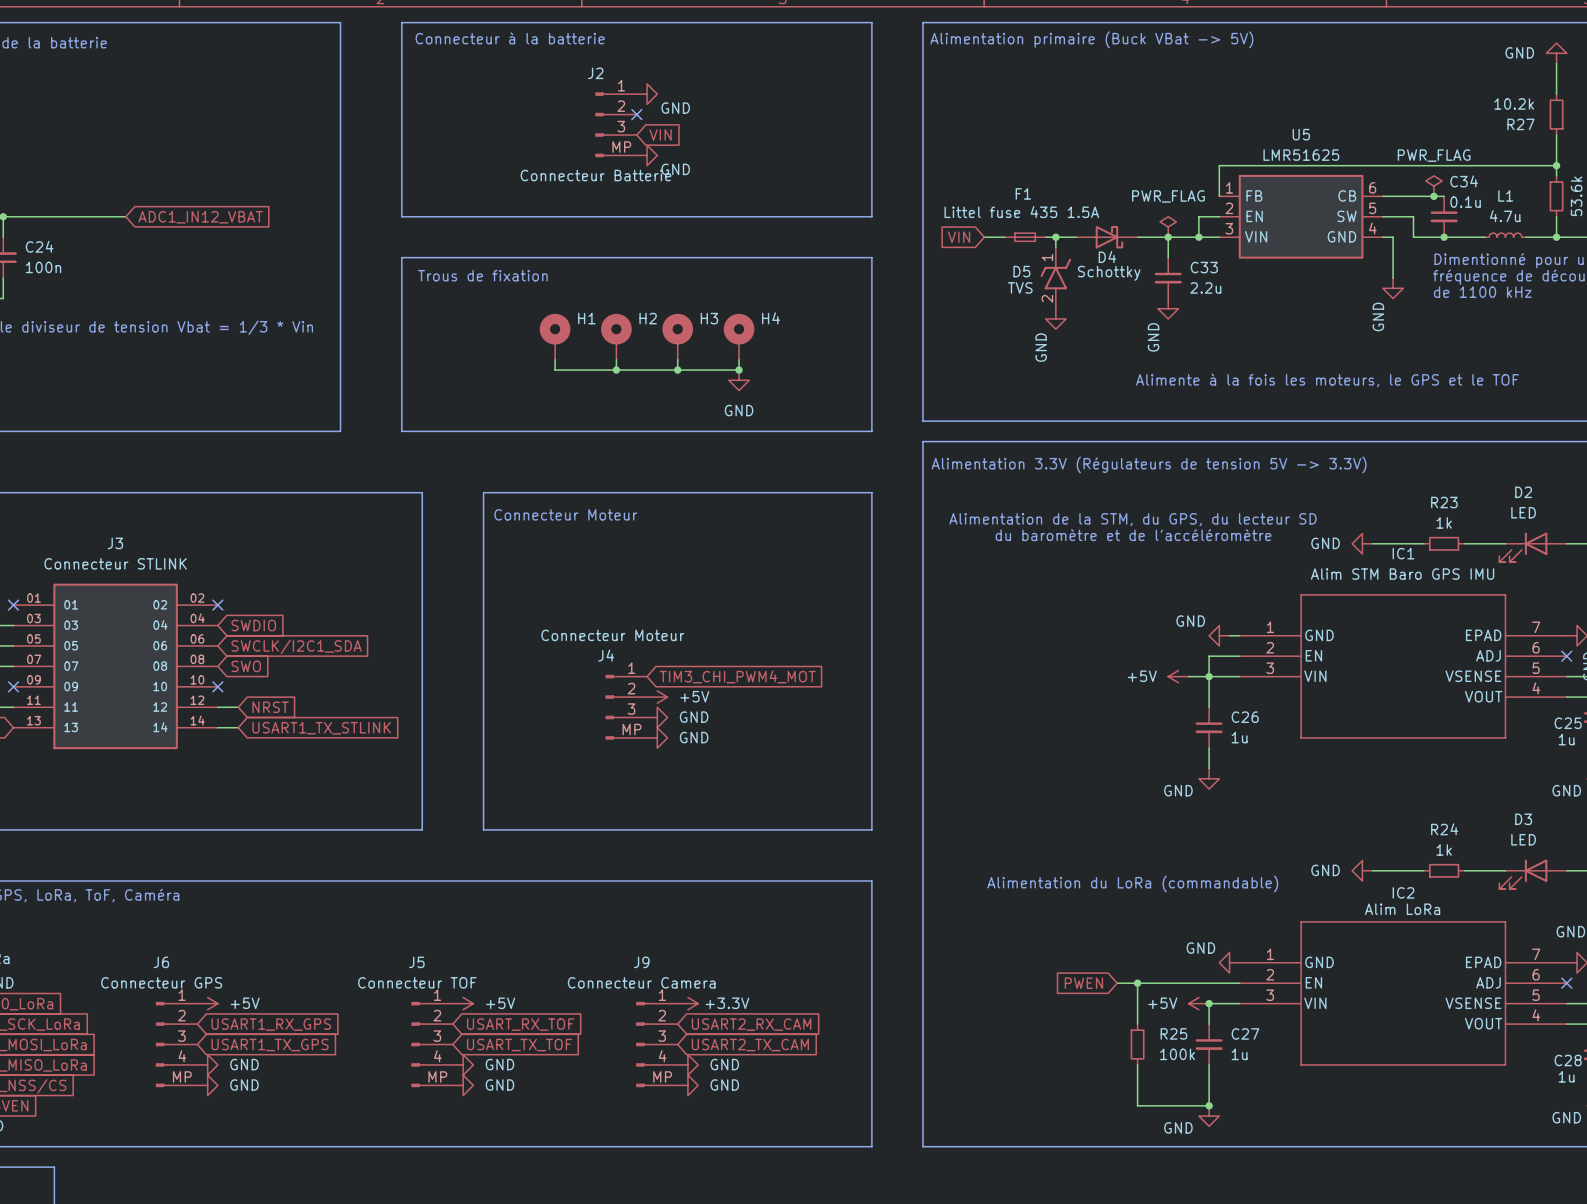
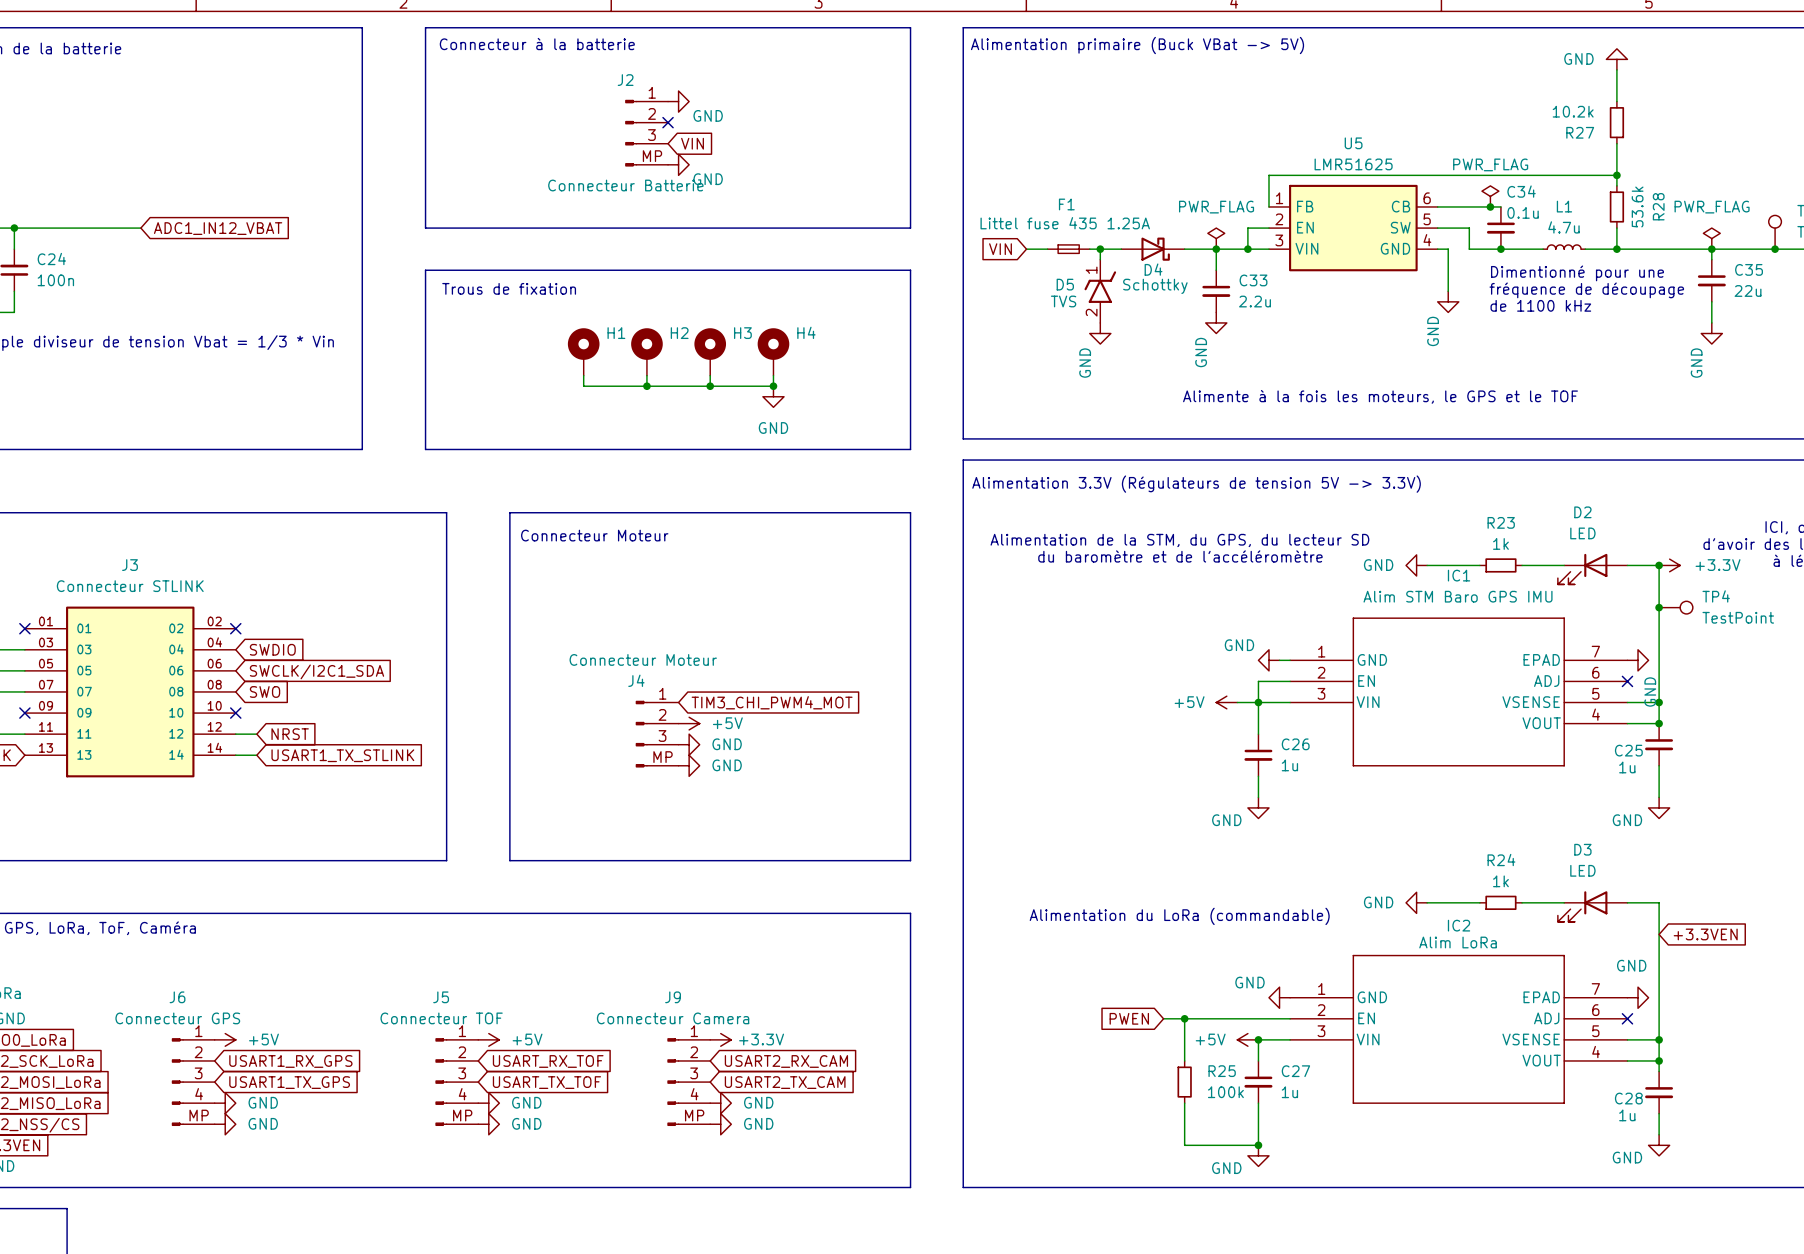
F1 value: Littel fuse 435 1.5A (1021, 212) -> Littel fuse 435 1.25A (1065, 223)

